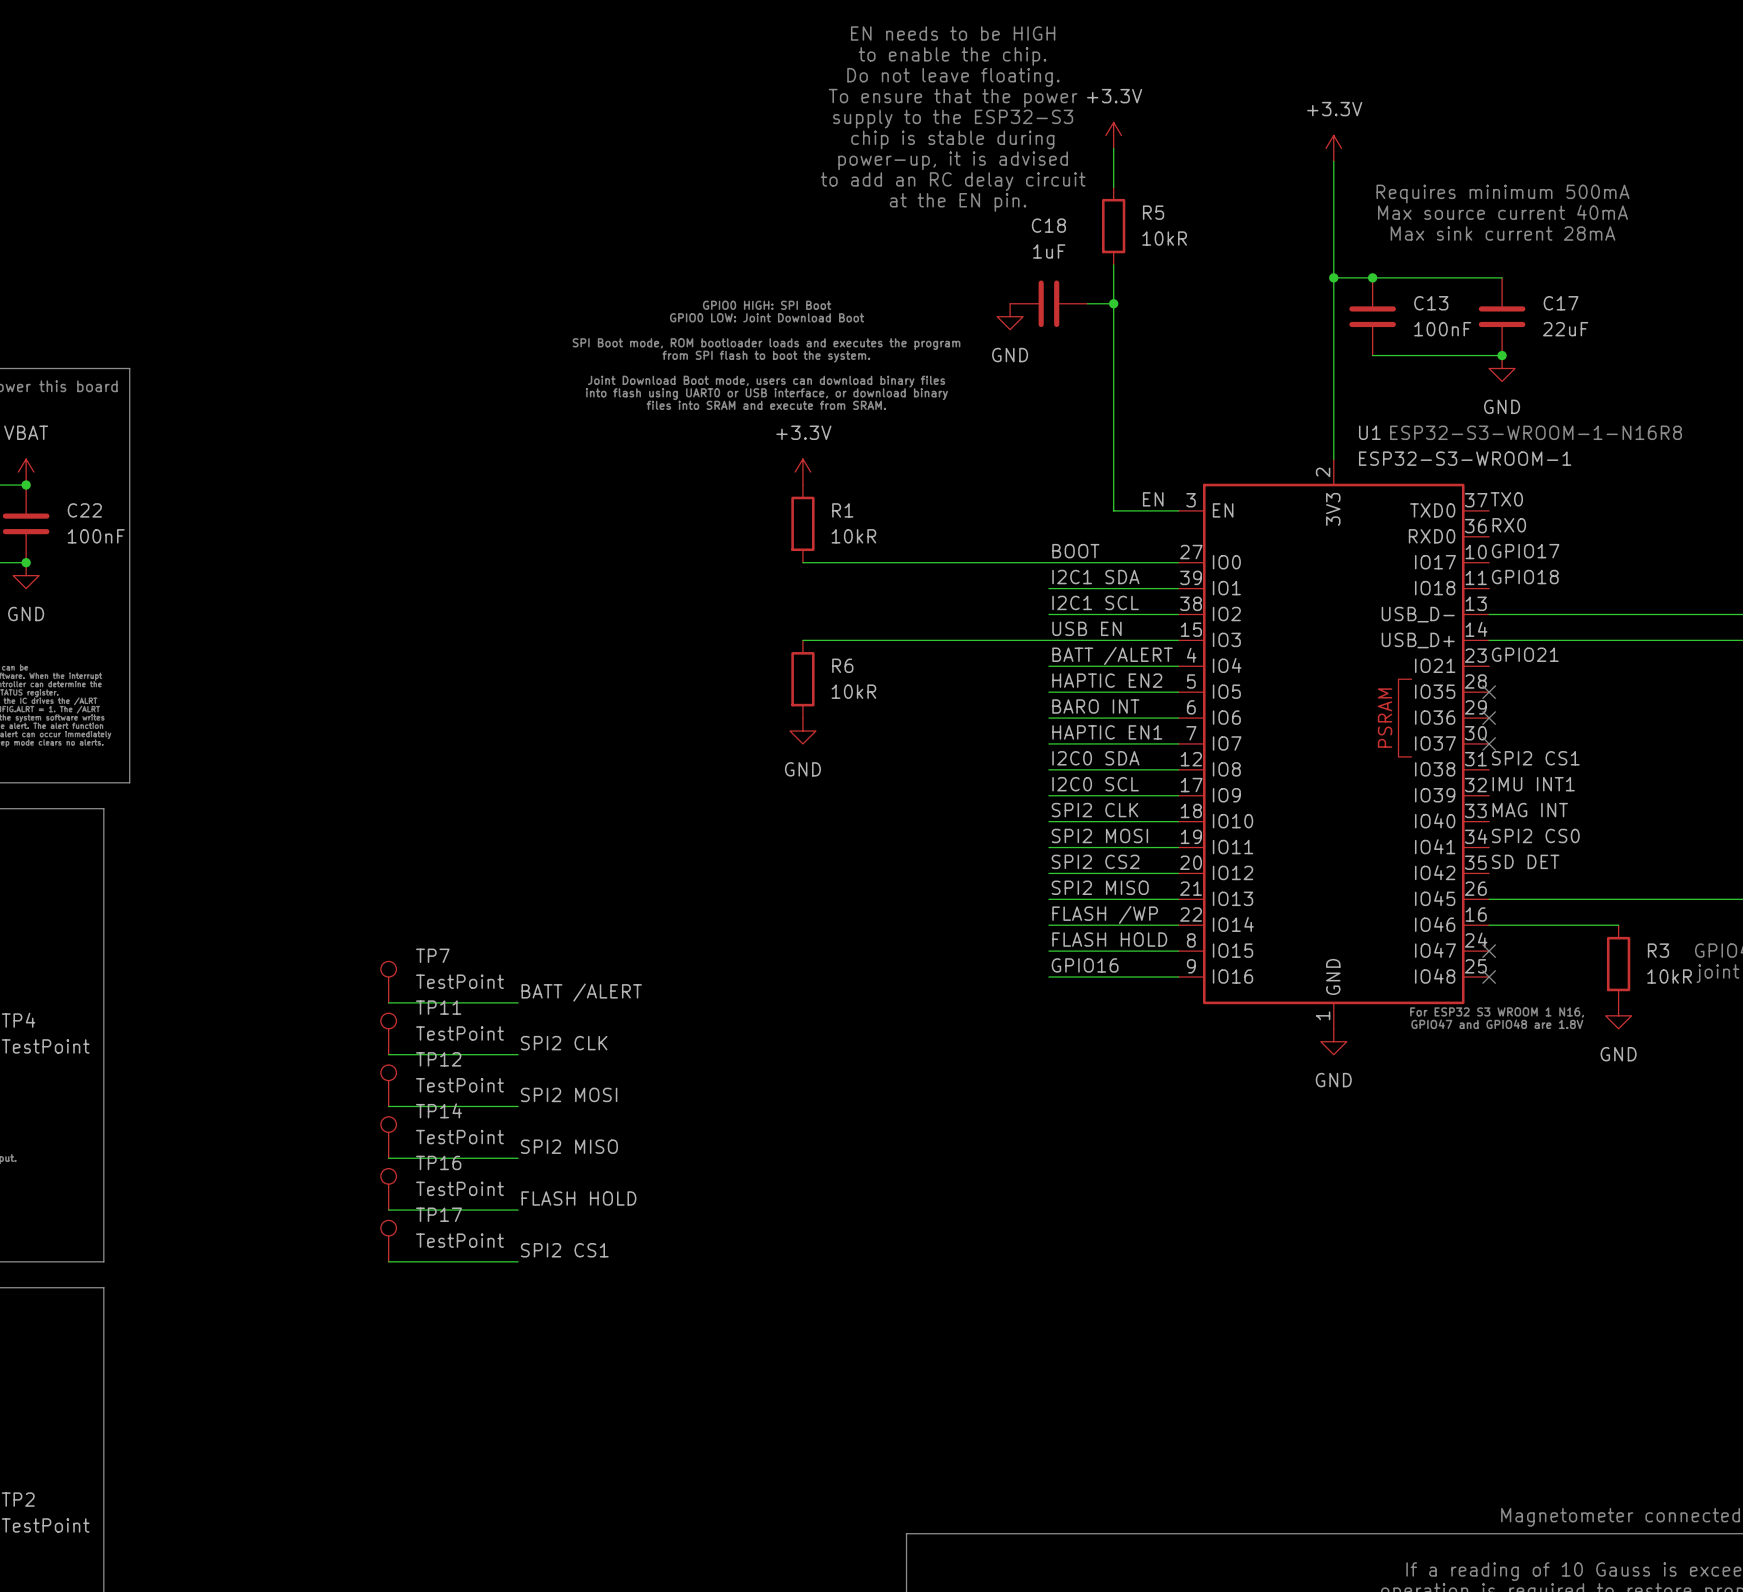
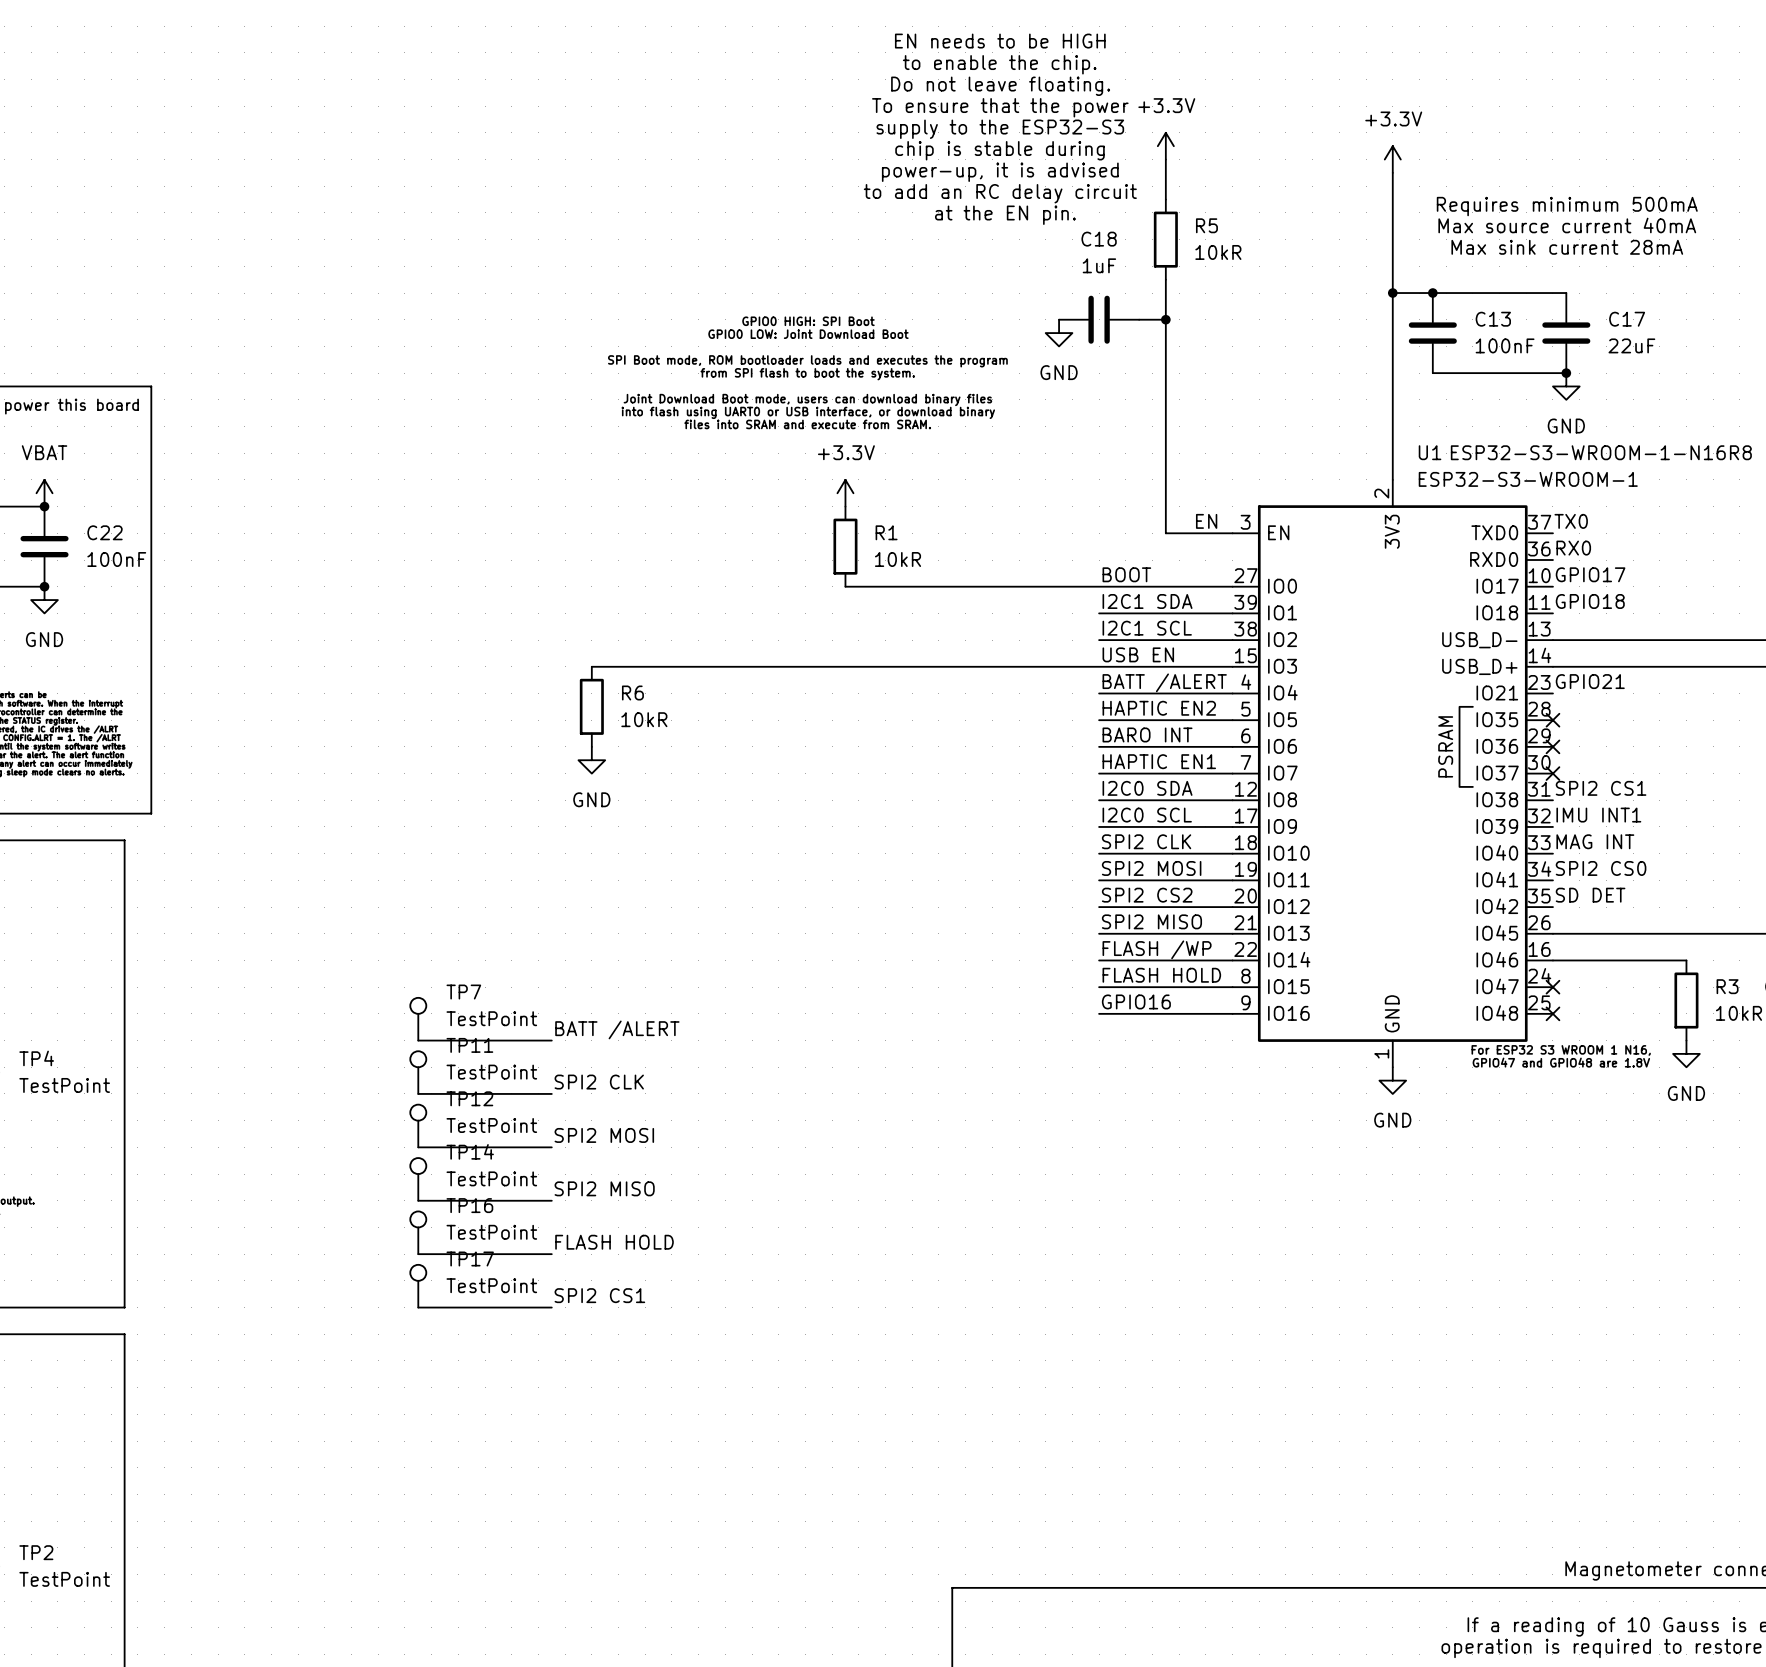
wire: none -> (591, 666) (845, 666)
R6 position: (802, 679) -> (591, 706)
power symbol position: GND (802, 731) -> GND (591, 760)

